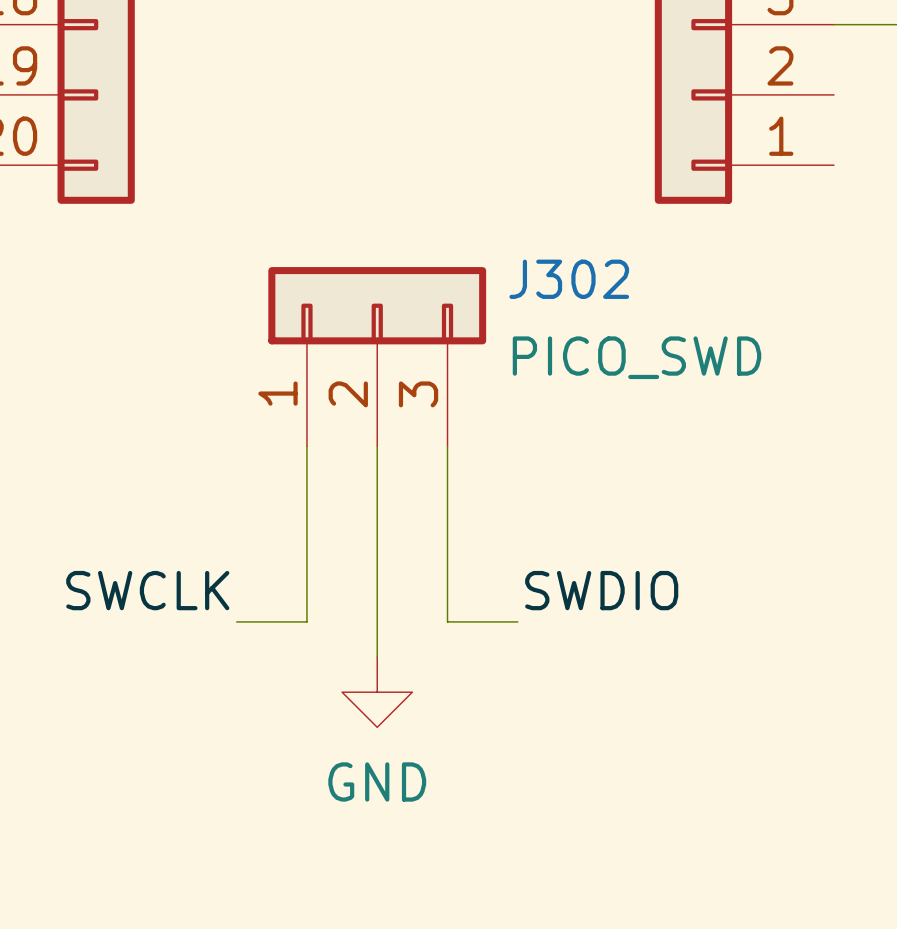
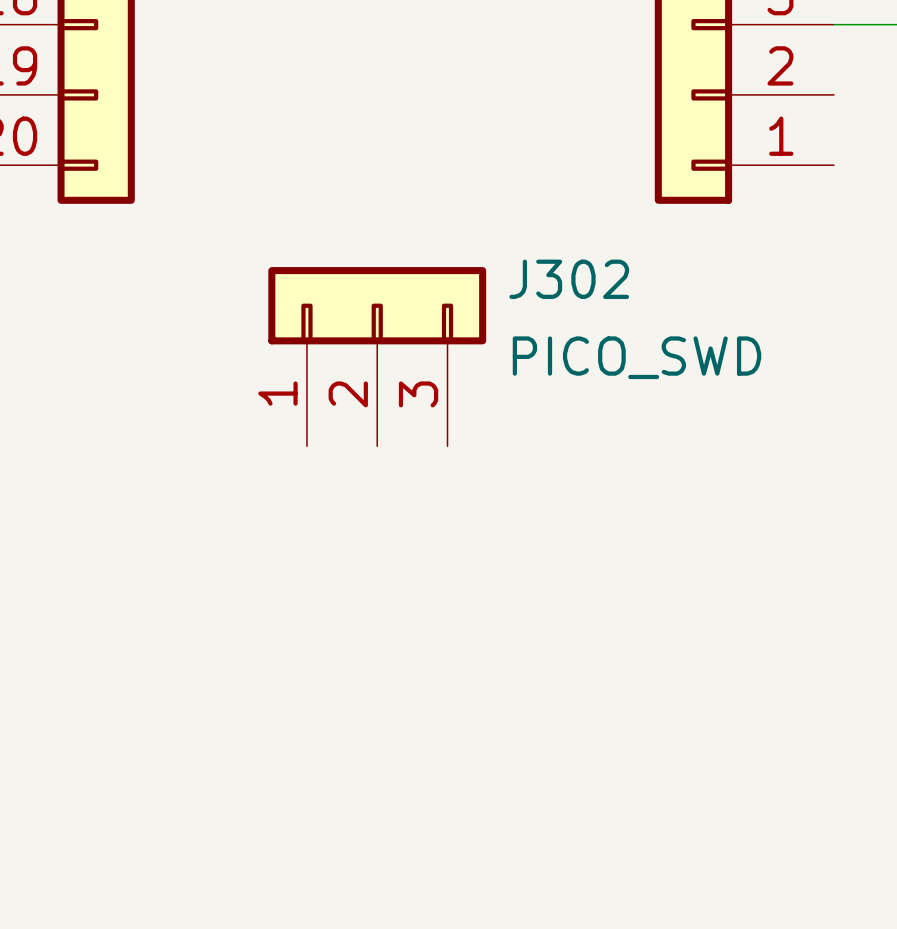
wire: (306, 446) (306, 621) (236, 621) -> none
wire: (377, 446) (377, 657) -> none
wire: (447, 446) (447, 621) (517, 621) -> none
label: SWCLK (147, 590) -> none
label: SWDIO (601, 590) -> none
power symbol: GND (377, 692) -> none

